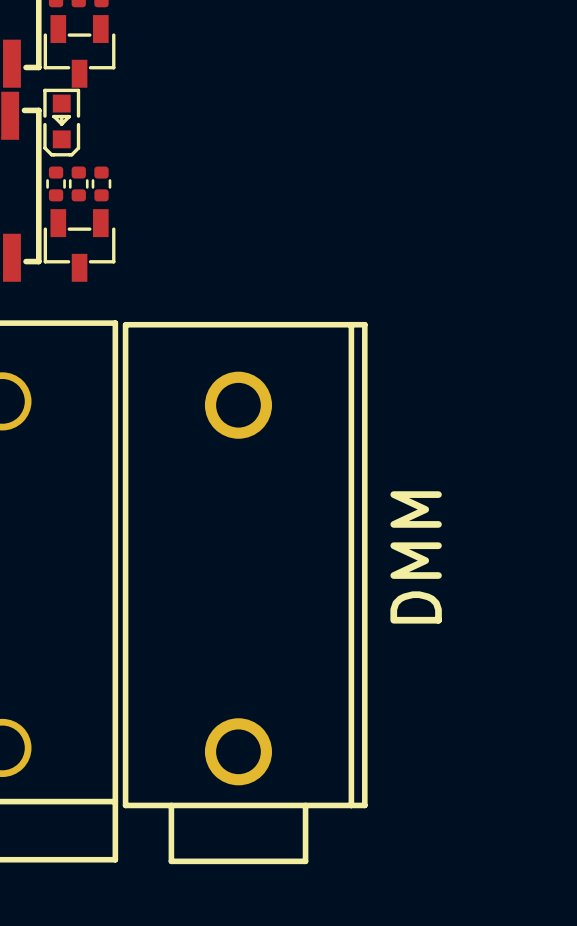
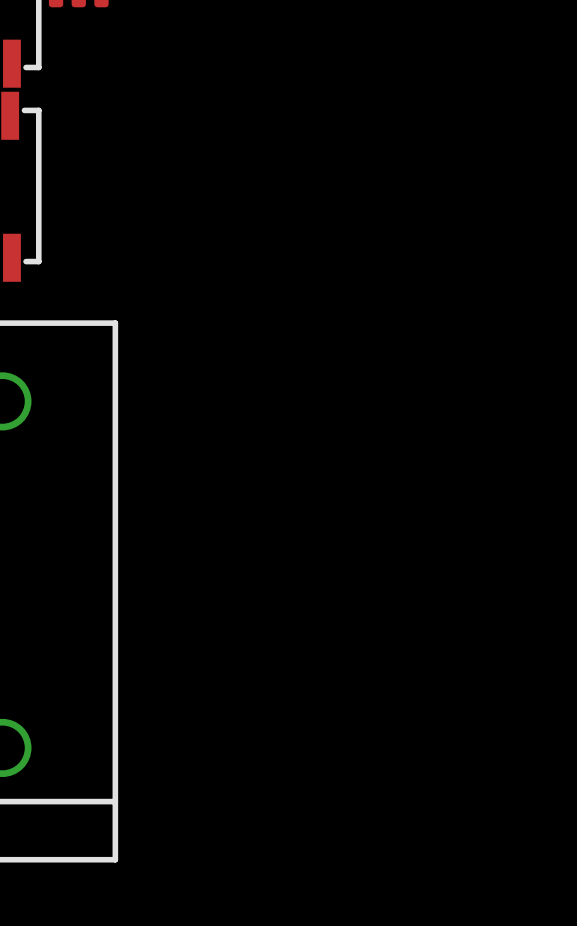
part: (79, 51) -> none
part: (61, 122) -> none
part: (56, 183) -> none
part: (78, 183) -> none
part: (101, 183) -> none
part: (79, 245) -> none
text: DMM (416, 557) -> none
part: (245, 593) -> none

